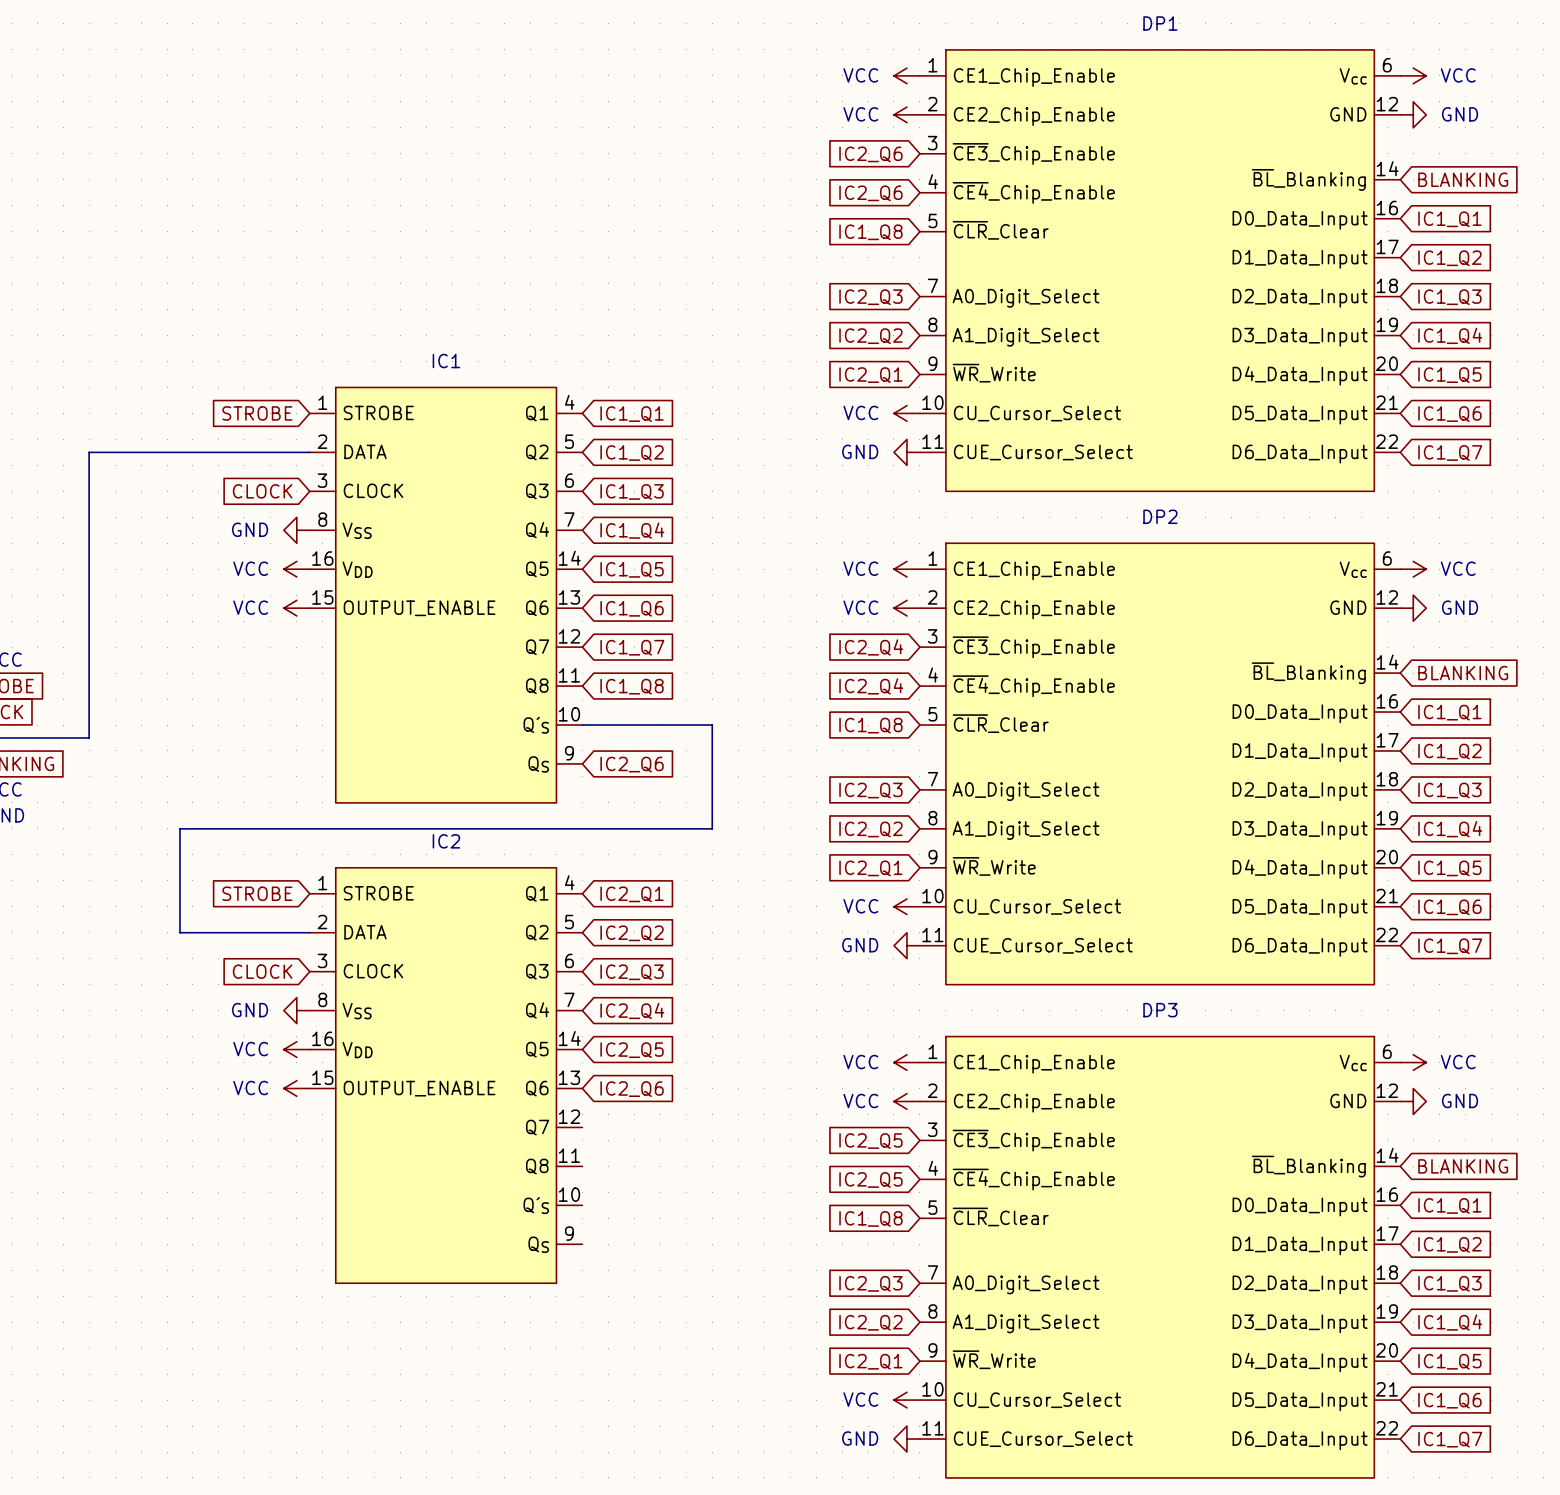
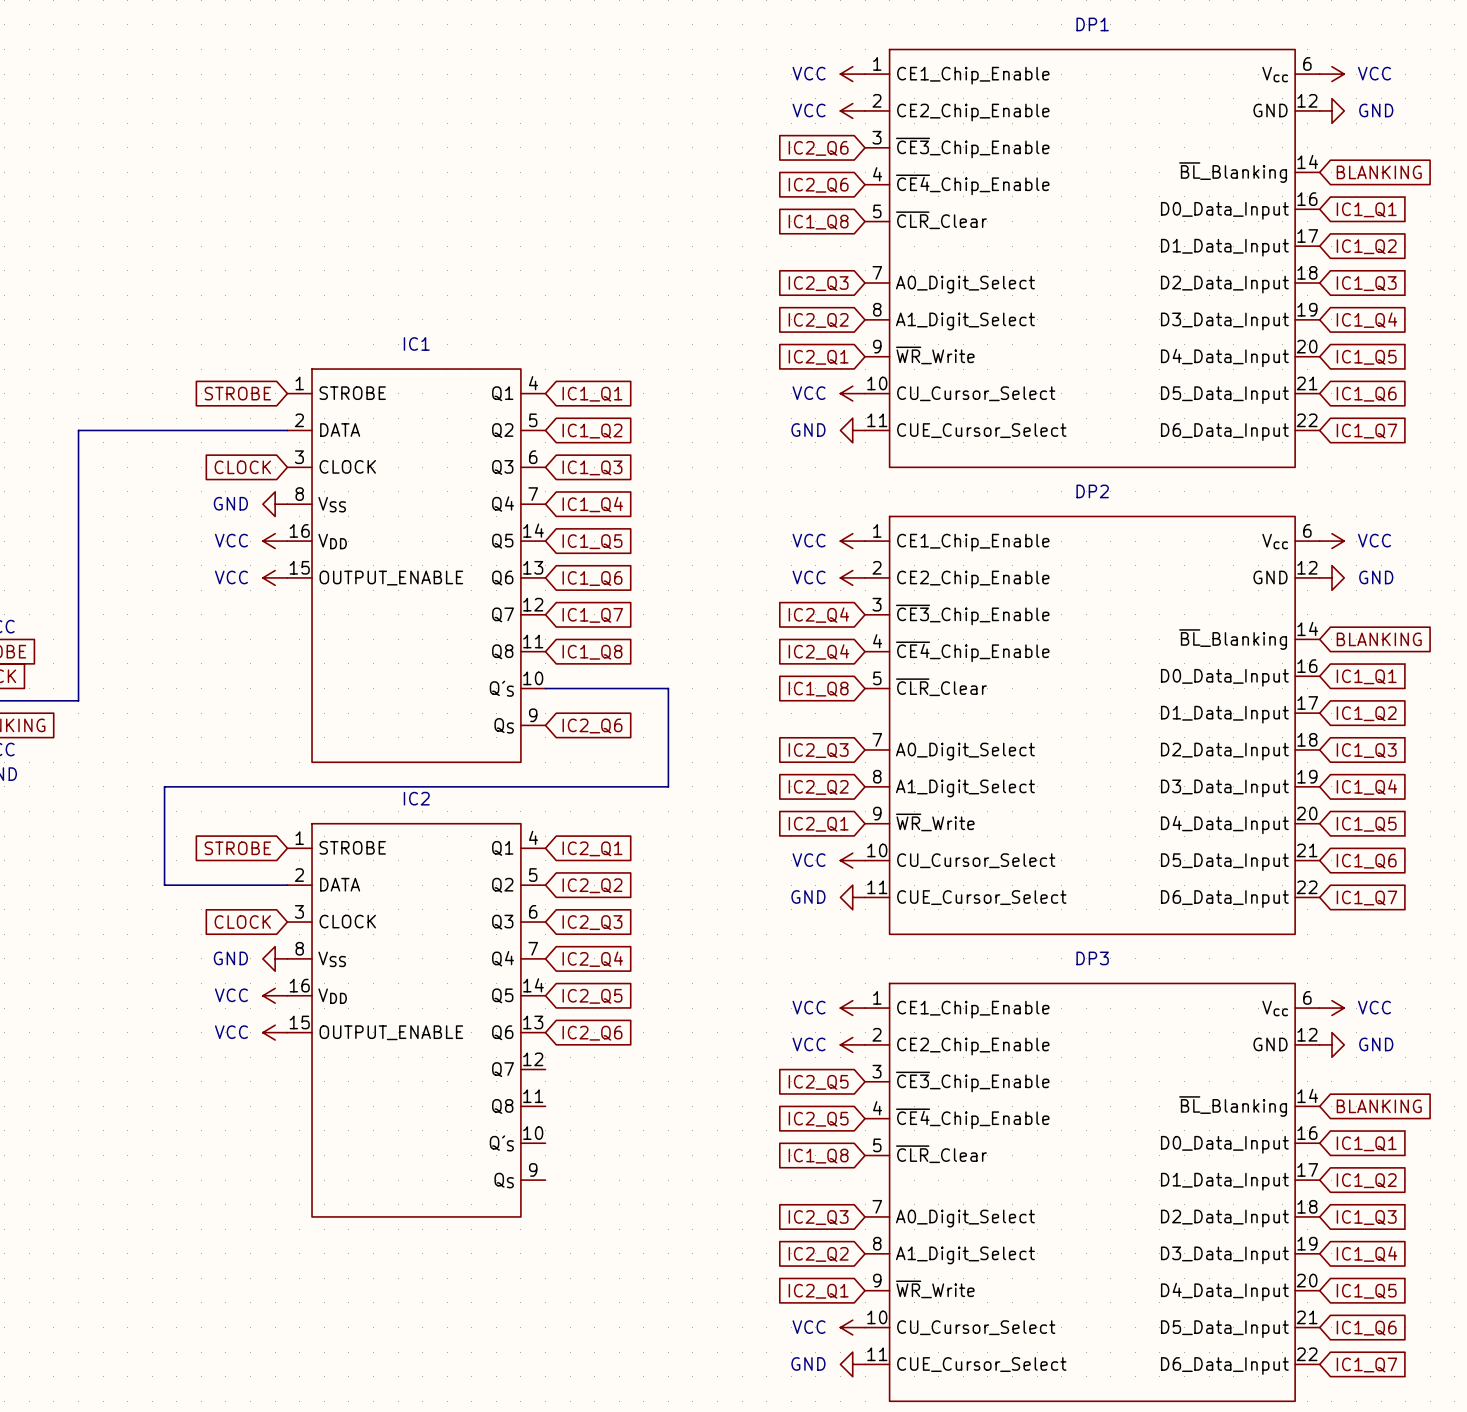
DP1 symbol: [919, 49, 1401, 492] -> [865, 49, 1320, 468]
IC1 symbol: [309, 387, 583, 803] -> [287, 369, 546, 763]
DP2 symbol: [919, 543, 1401, 985] -> [865, 516, 1320, 935]
IC2 symbol: [309, 867, 583, 1284] -> [287, 823, 546, 1217]
DP3 symbol: [919, 1036, 1401, 1478] -> [865, 983, 1320, 1402]

